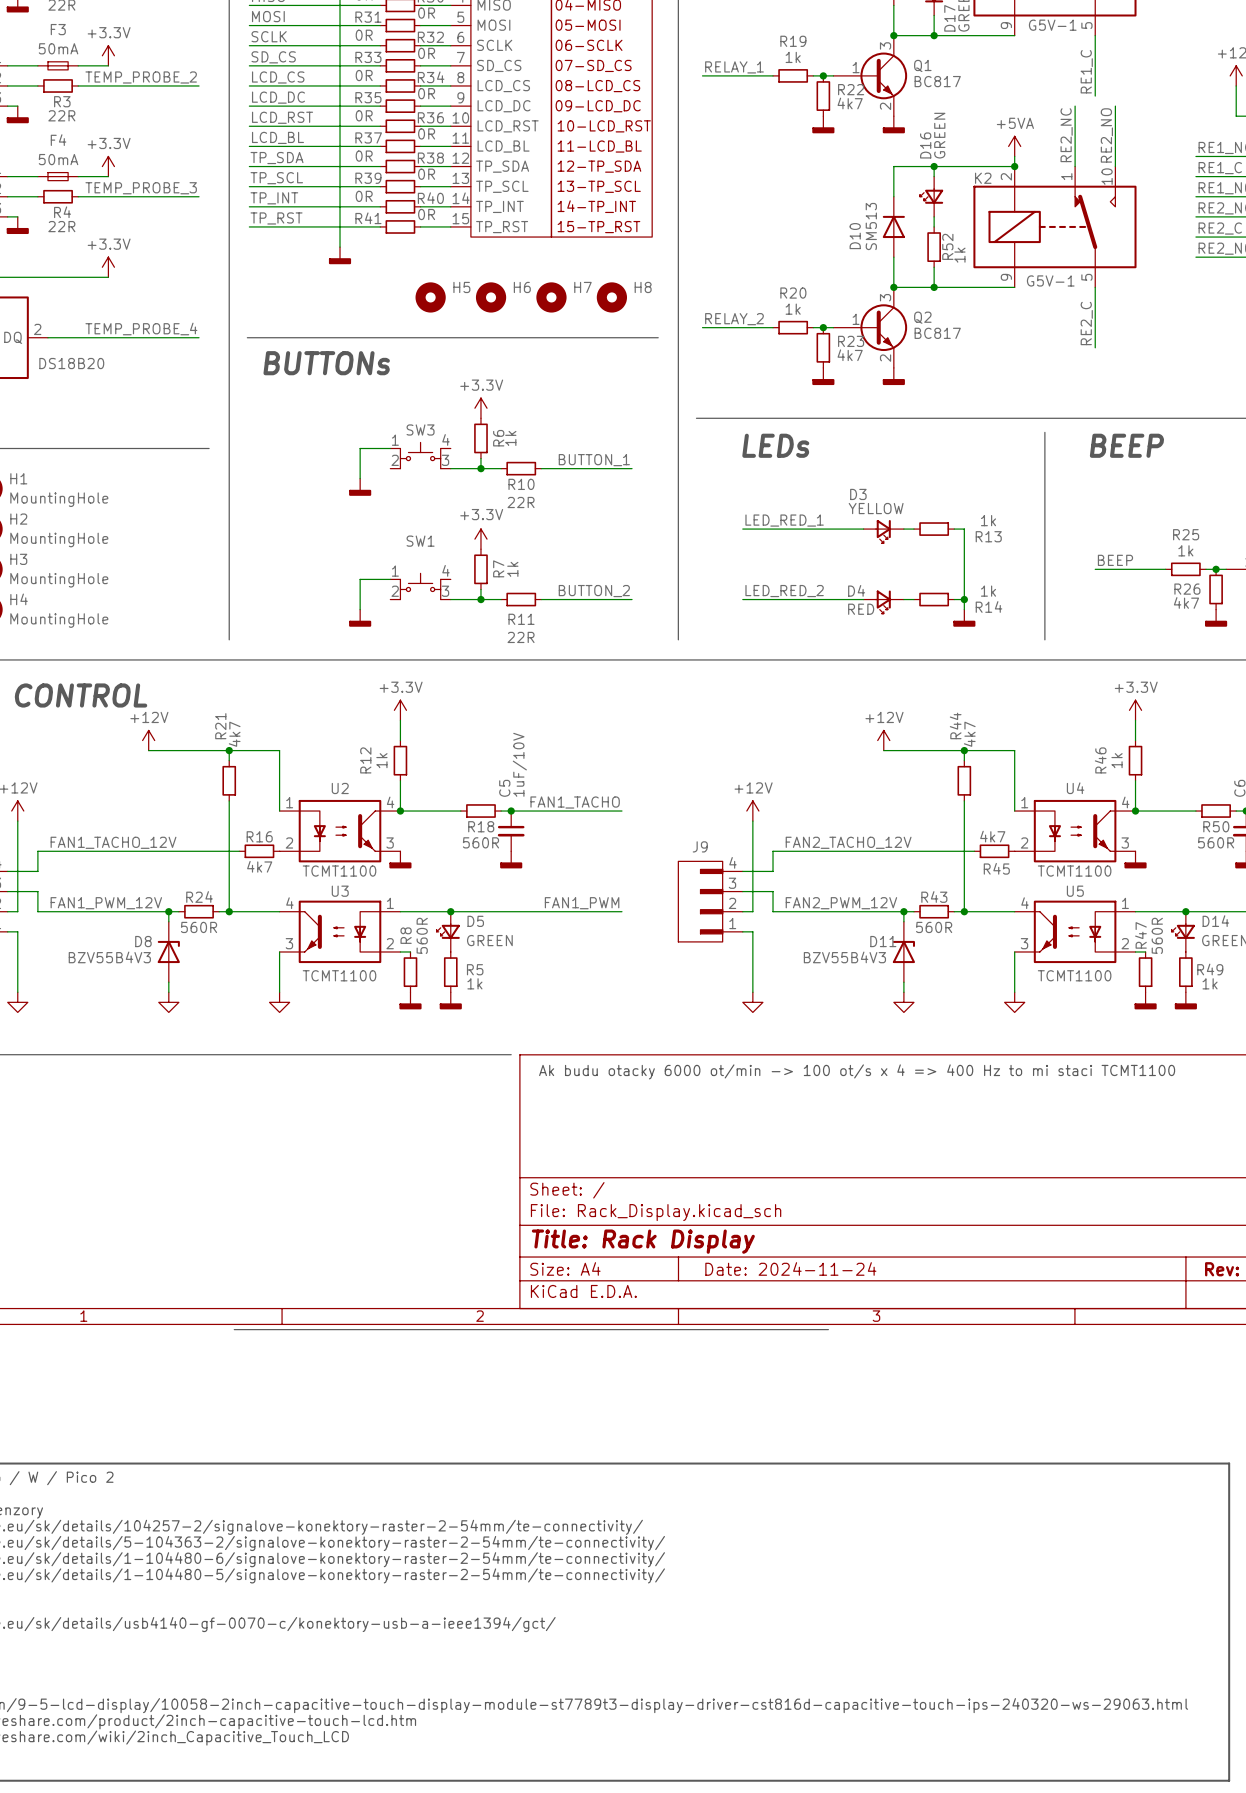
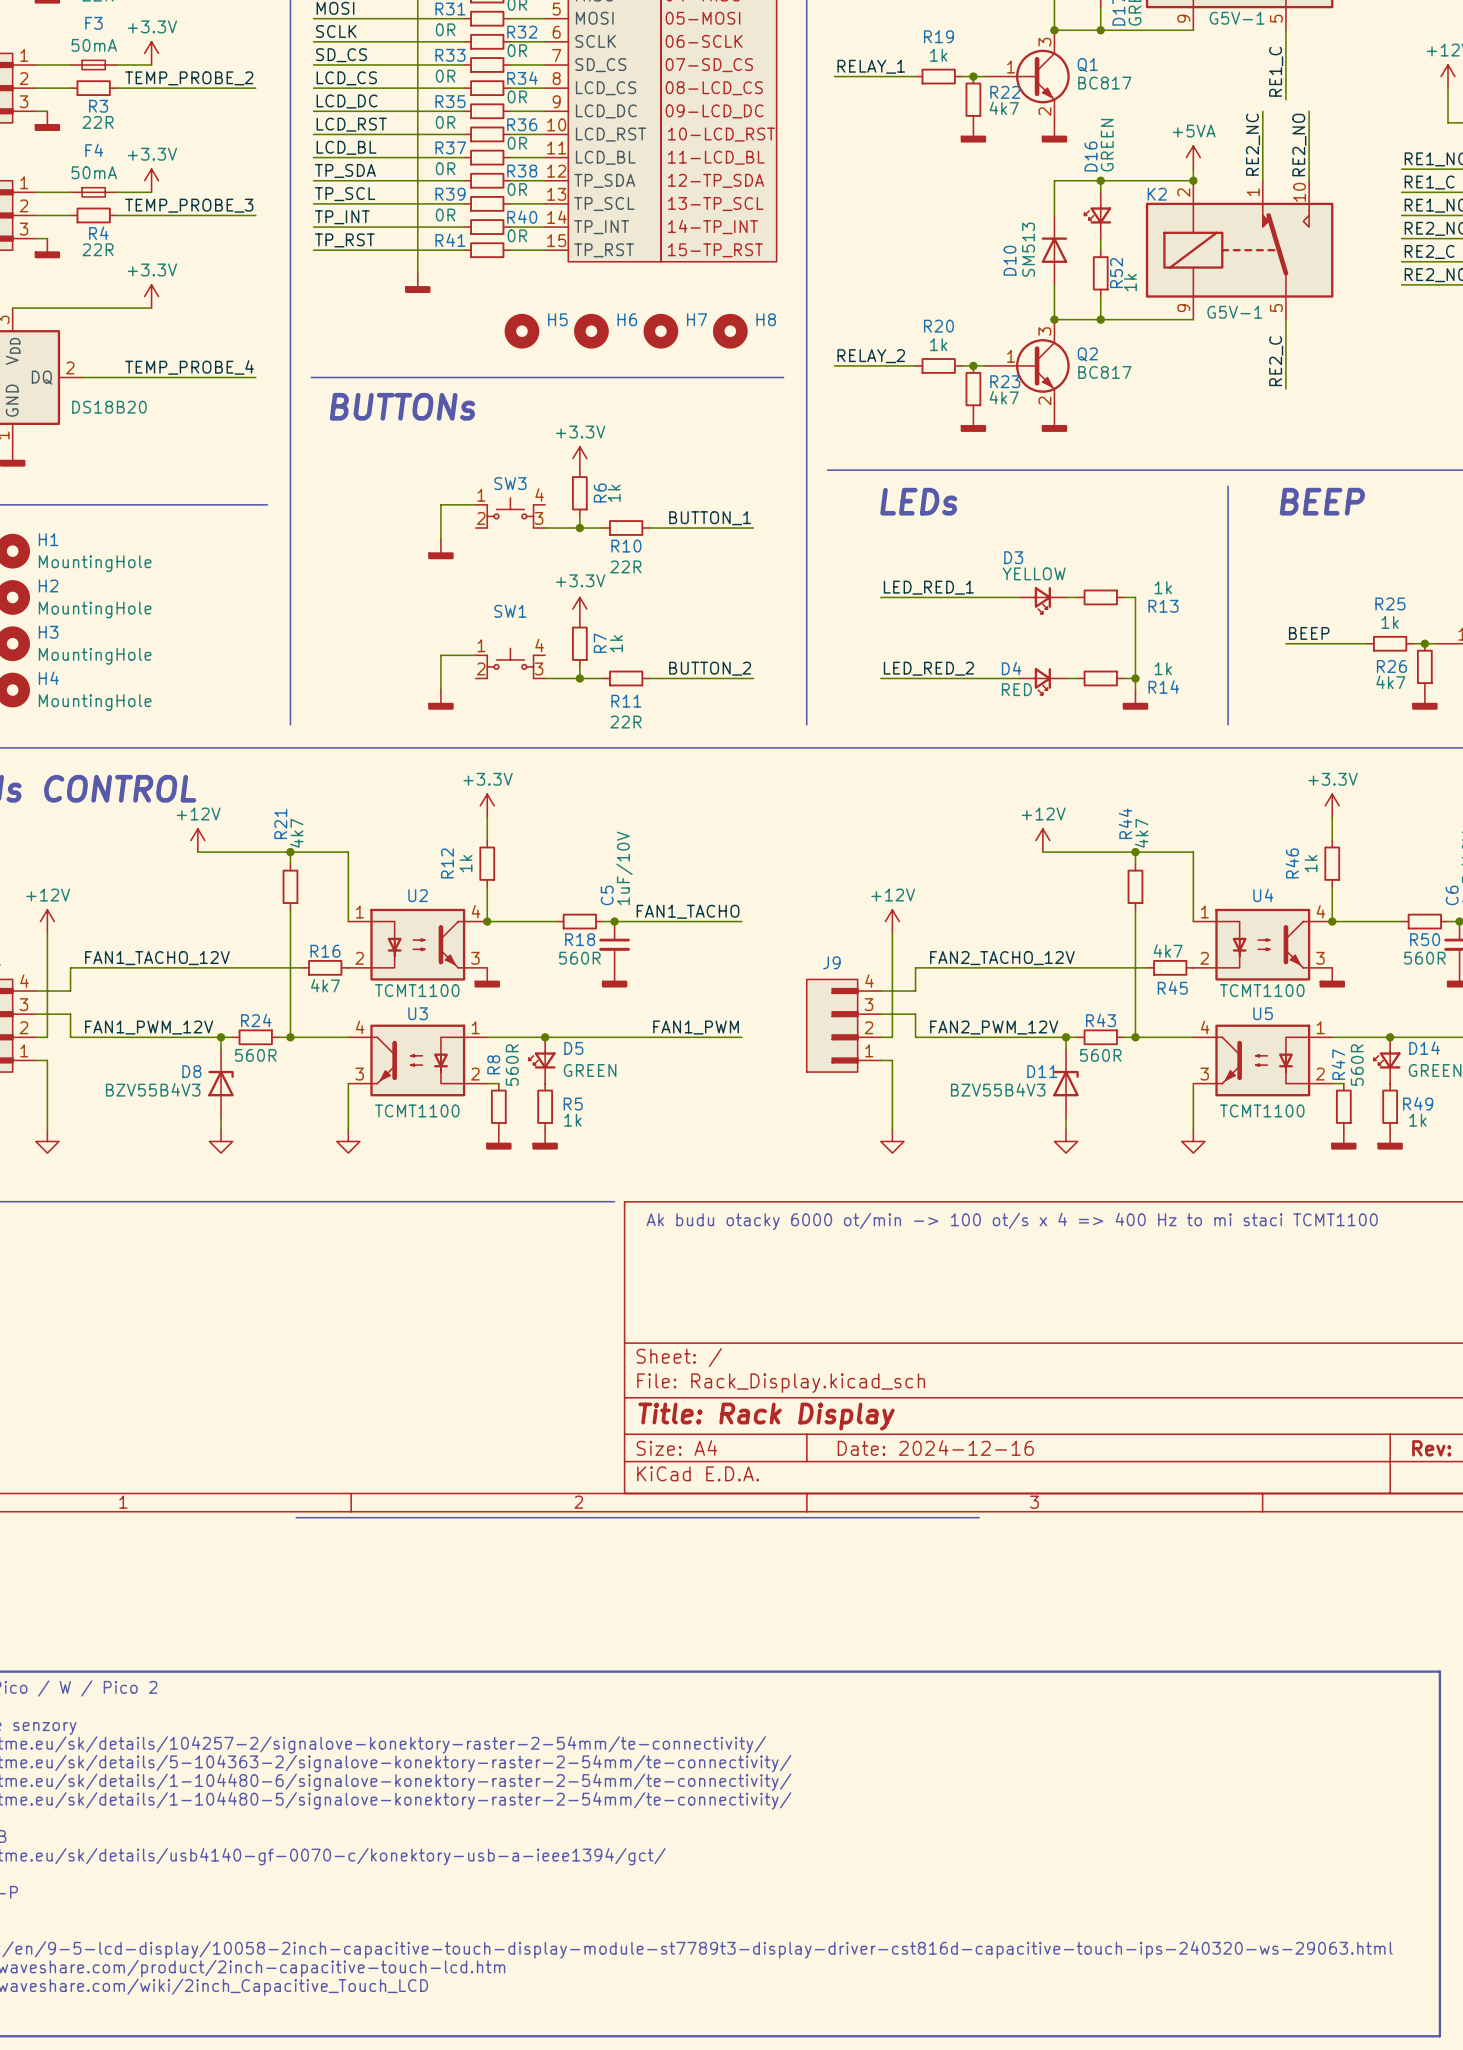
title block: Date: 2024-11-24 (790, 1268) -> Date: 2024-12-16 (935, 1447)

